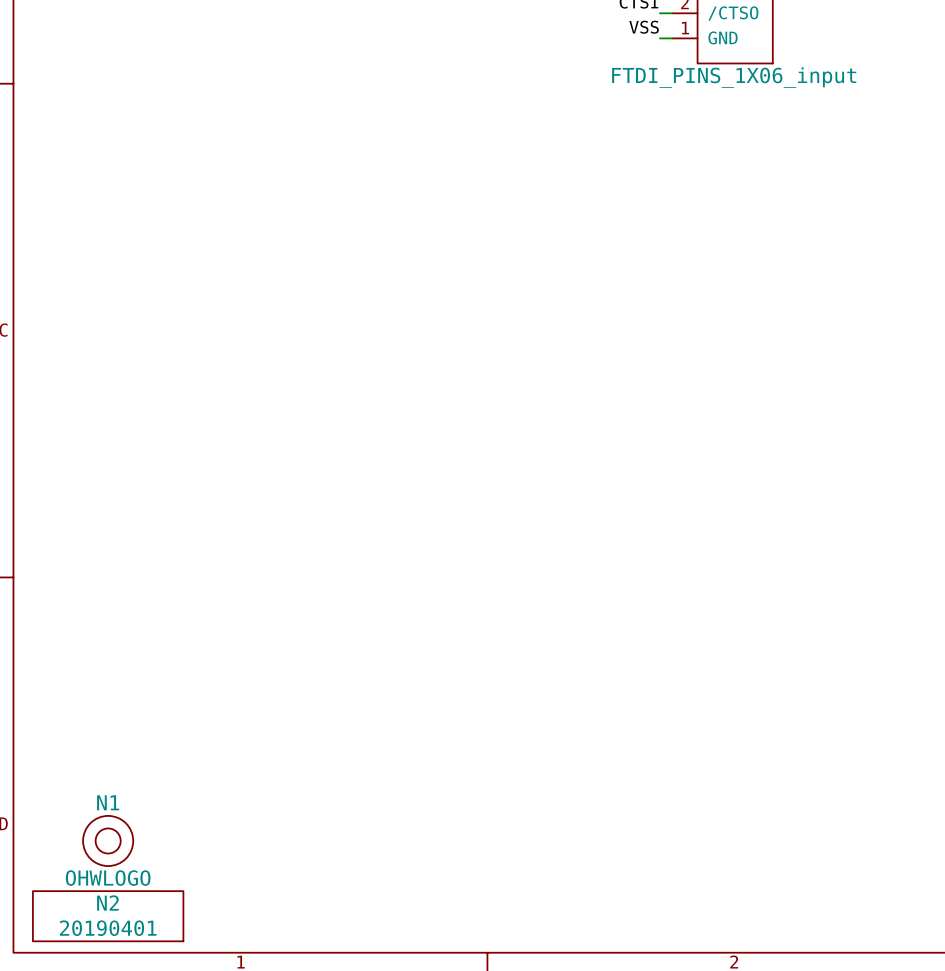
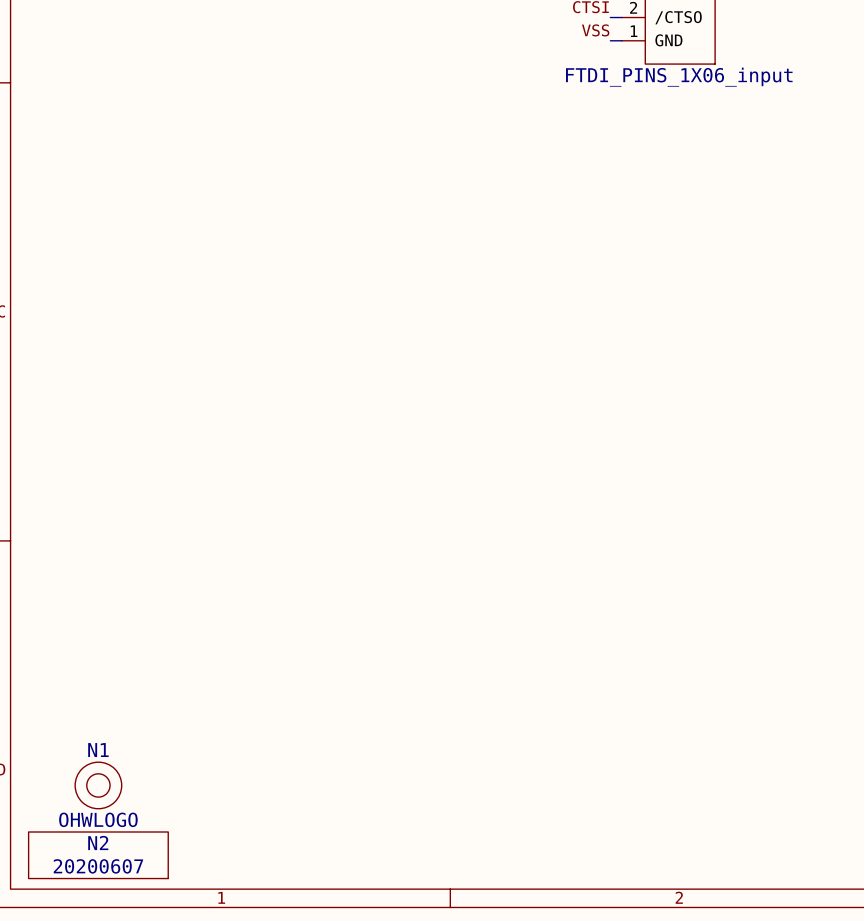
N2 value: 20190401 (108, 928) -> 20200607 (98, 866)

